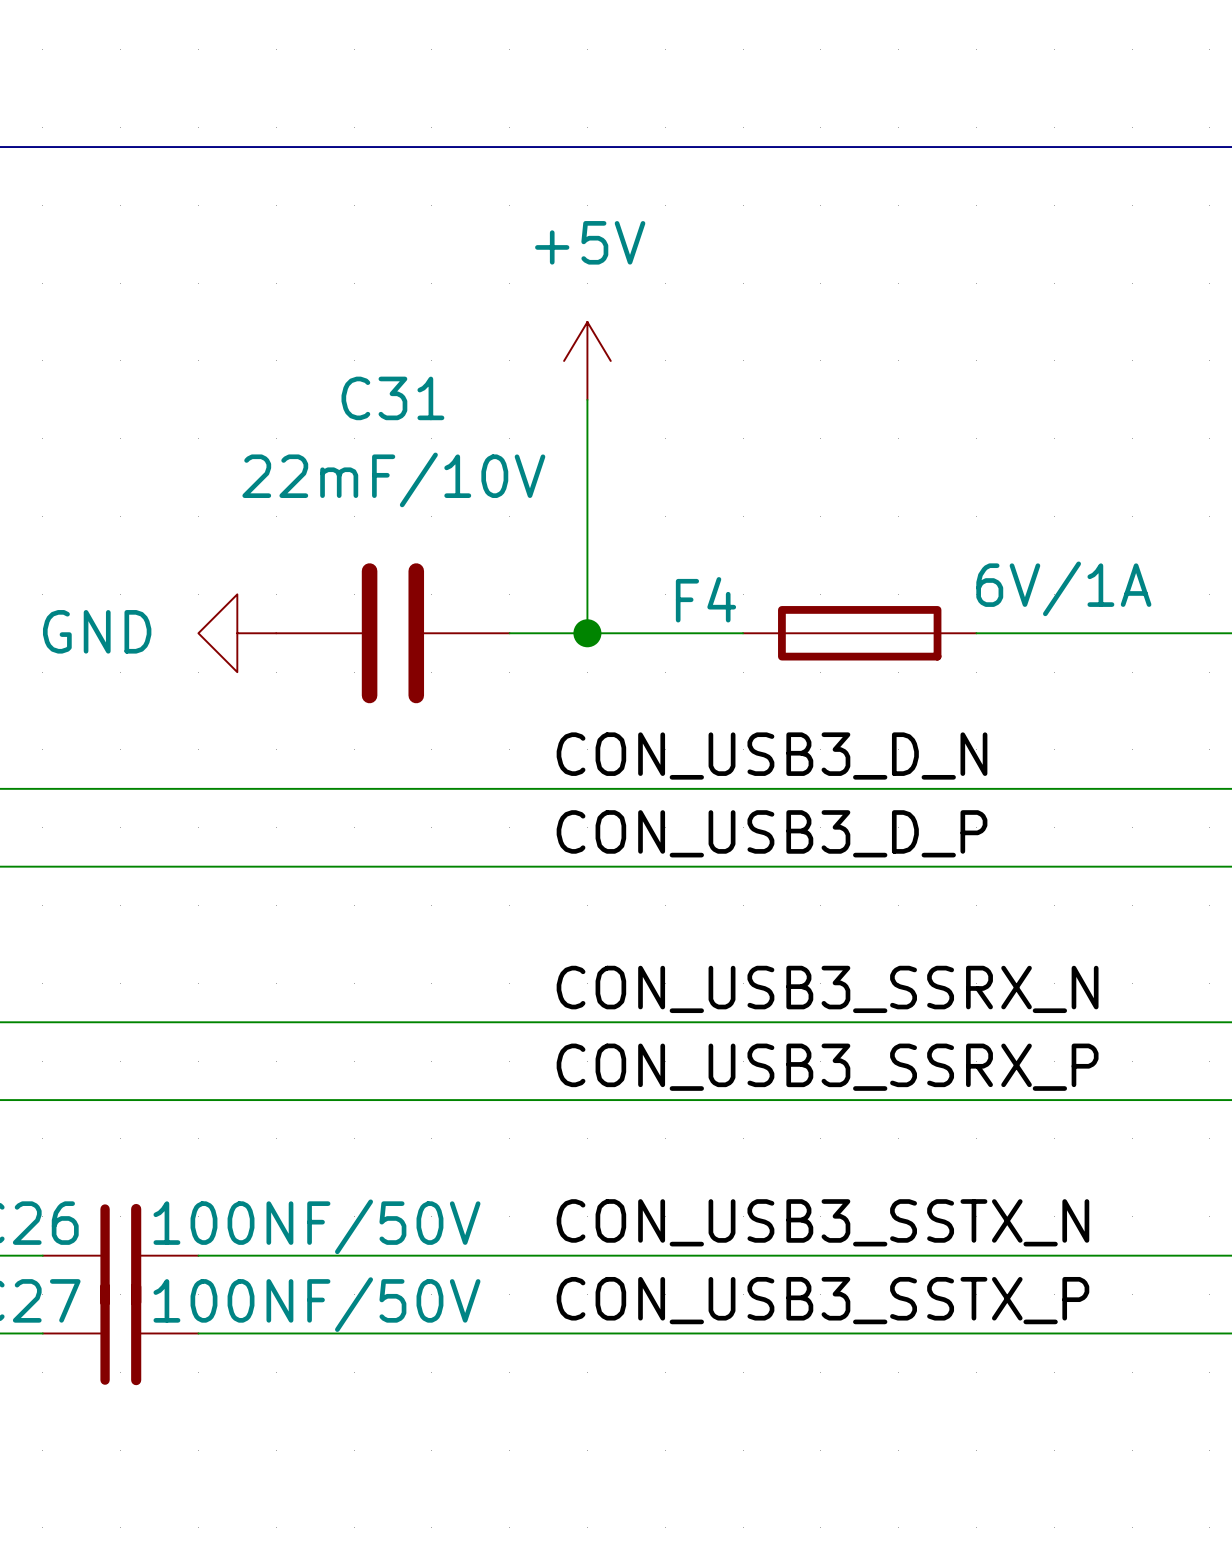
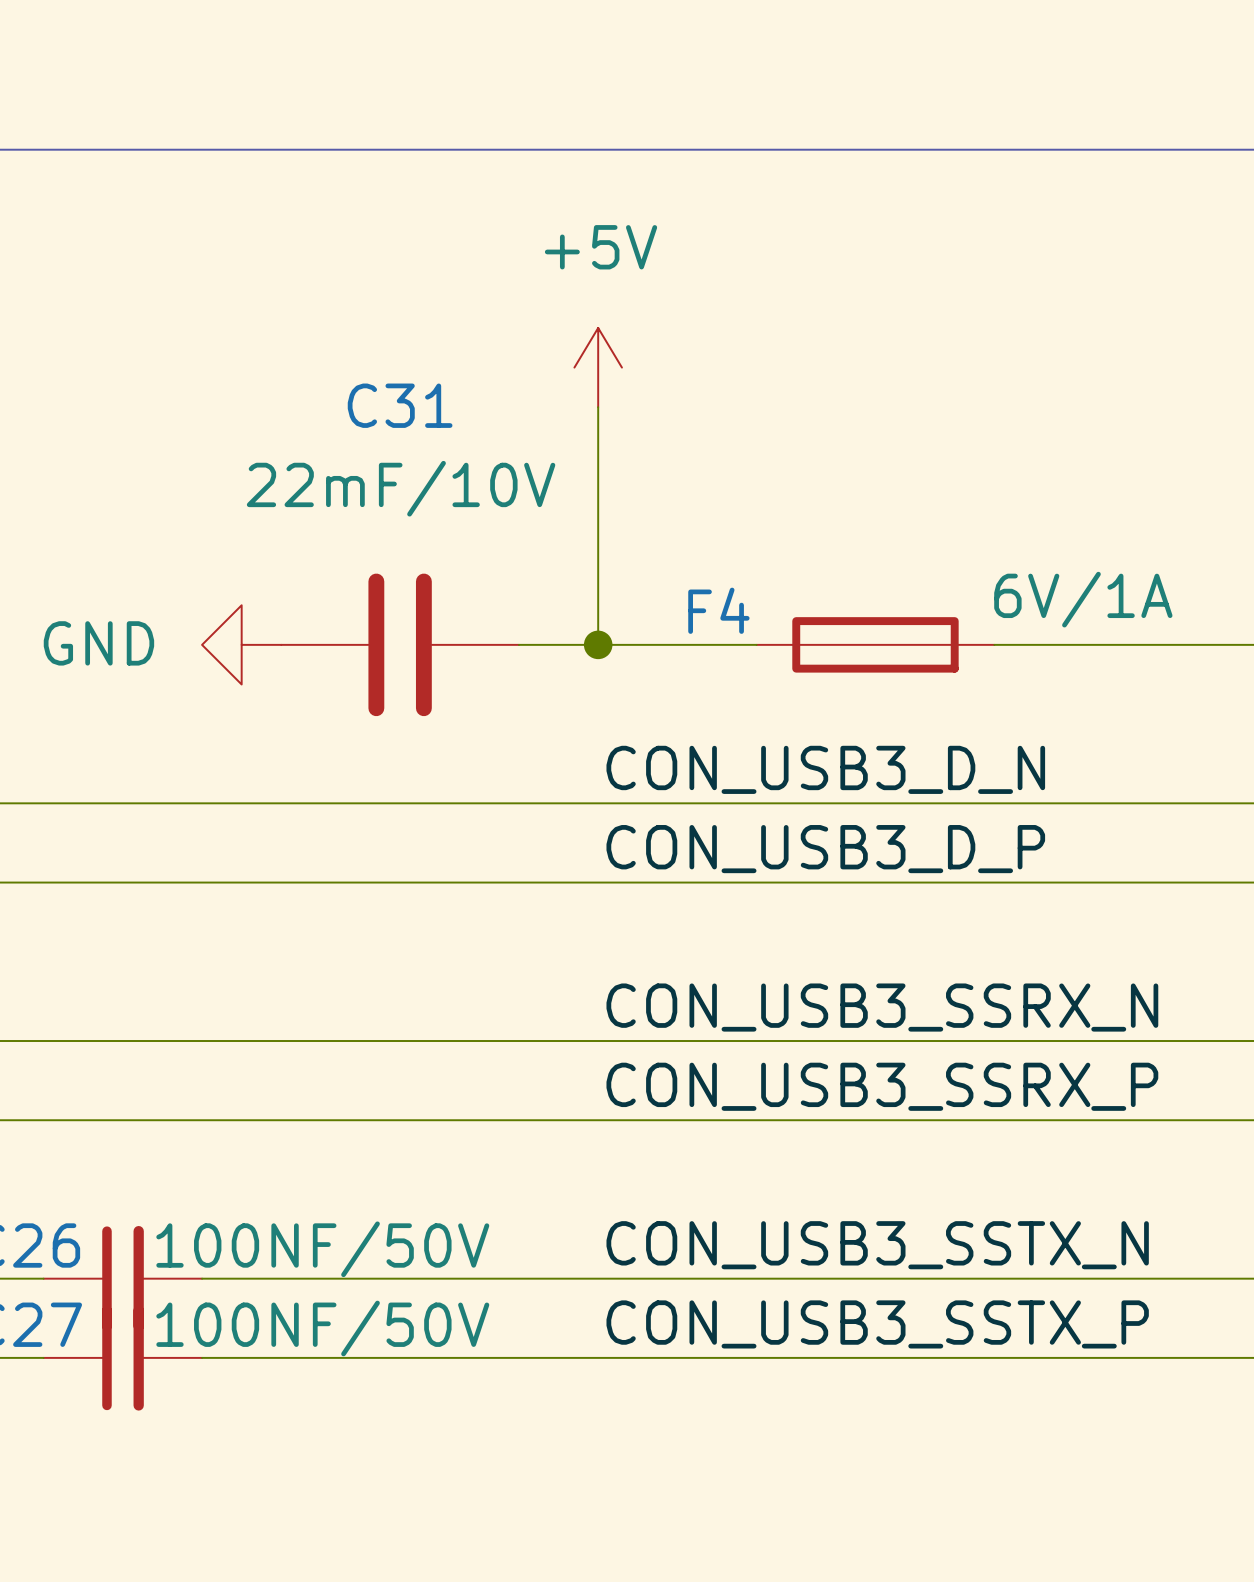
label position: CON_USB3_D_N (772, 756) -> CON_USB3_D_N (825, 769)
label position: CON_USB3_D_P (772, 833) -> CON_USB3_D_P (825, 849)
label position: CON_USB3_SSRX_N (827, 989) -> CON_USB3_SSRX_N (882, 1007)
label position: CON_USB3_SSRX_P (827, 1067) -> CON_USB3_SSRX_P (882, 1086)
label position: CON_USB3_SSTX_N (822, 1222) -> CON_USB3_SSTX_N (877, 1245)
label position: CON_USB3_SSTX_P (822, 1300) -> CON_USB3_SSTX_P (877, 1324)

